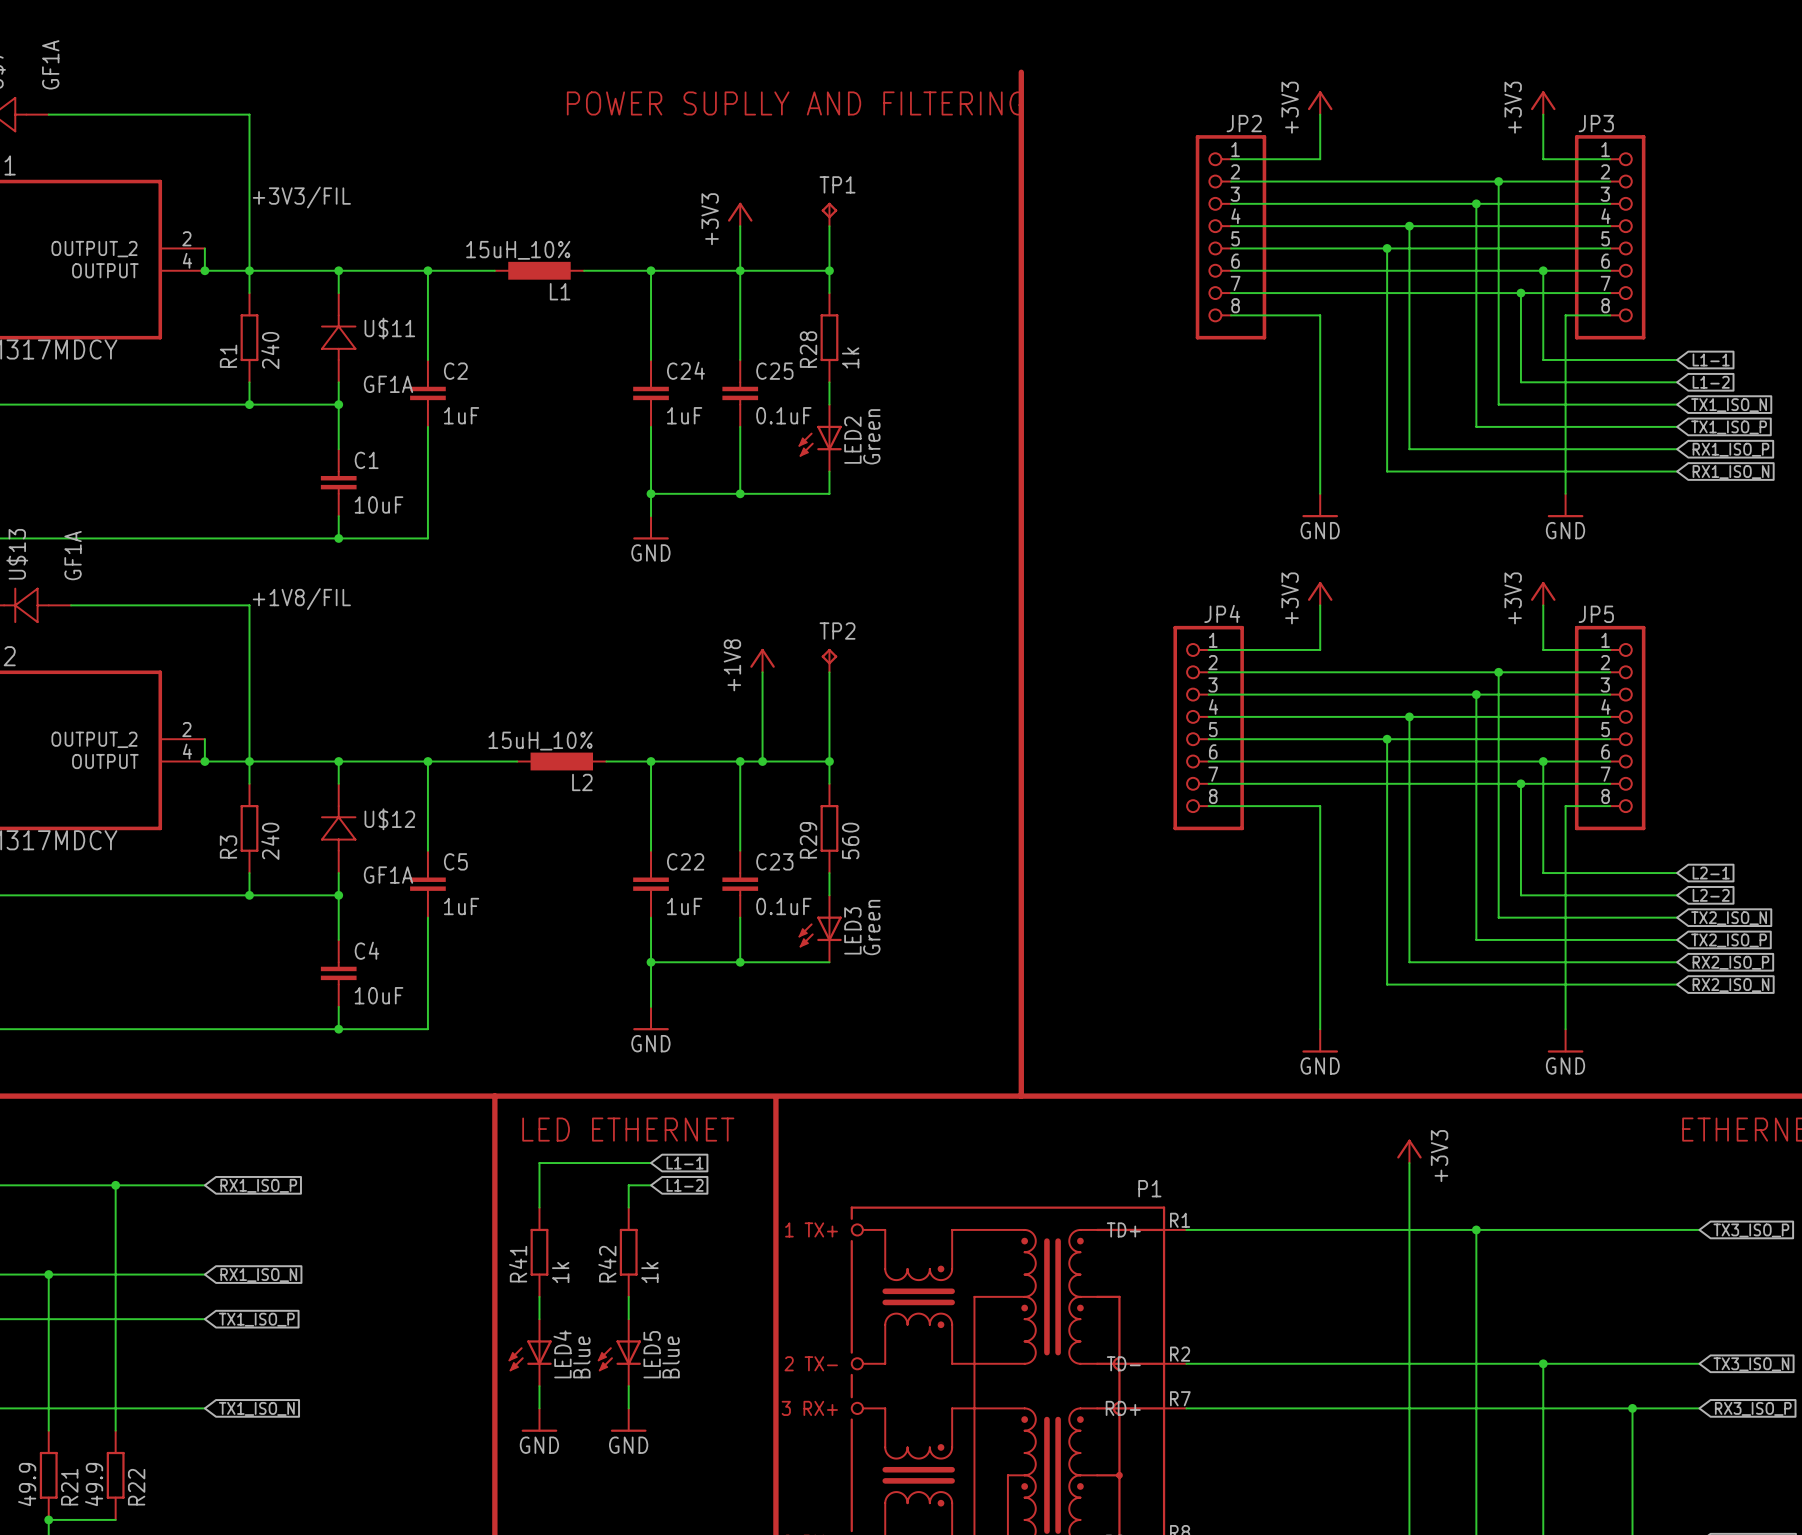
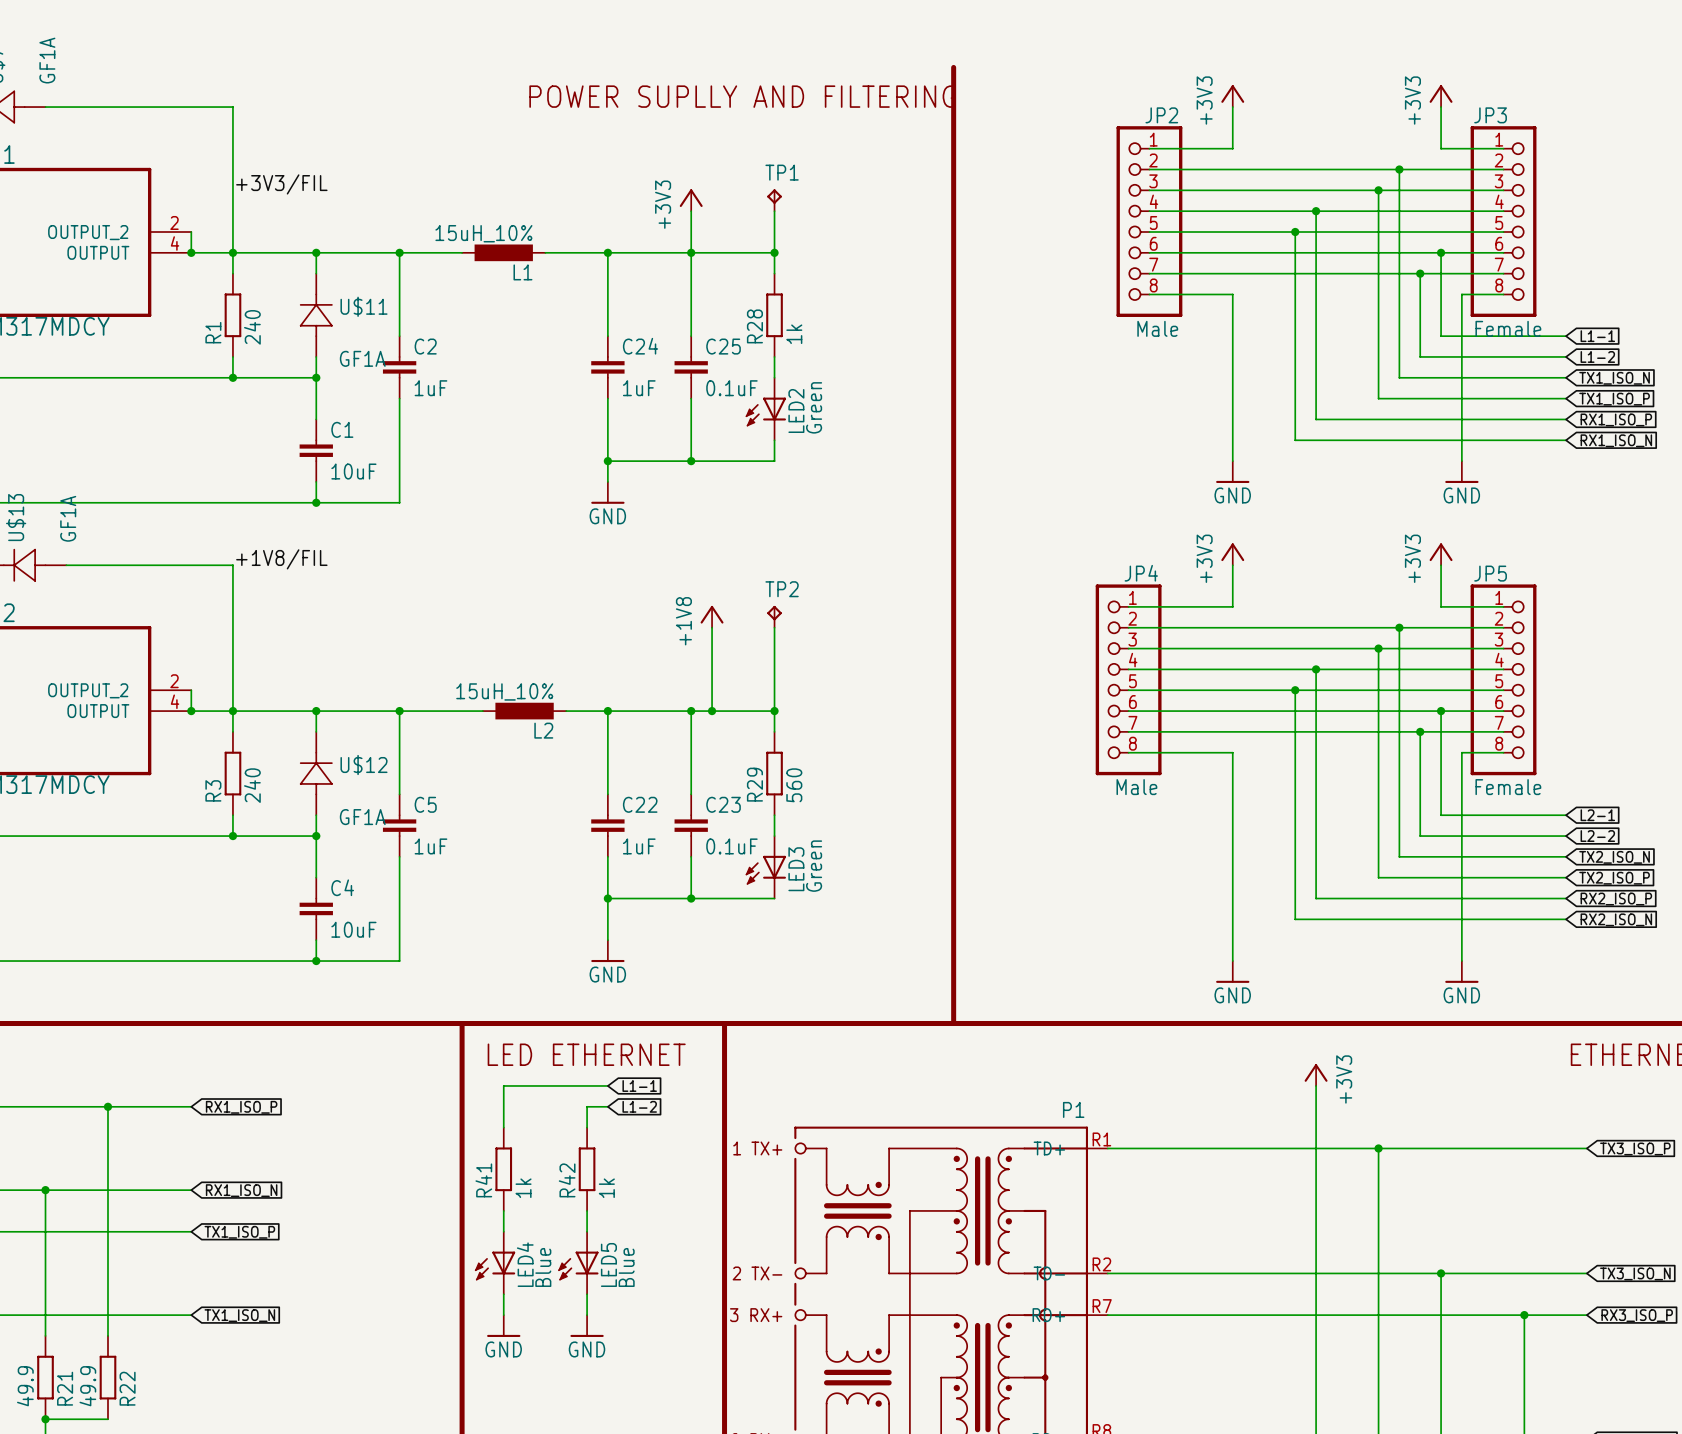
JP2 value: none -> Male (1157, 328)
JP3 value: none -> Female (1508, 328)
JP4 value: none -> Male (1136, 787)
JP5 value: none -> Female (1508, 787)

